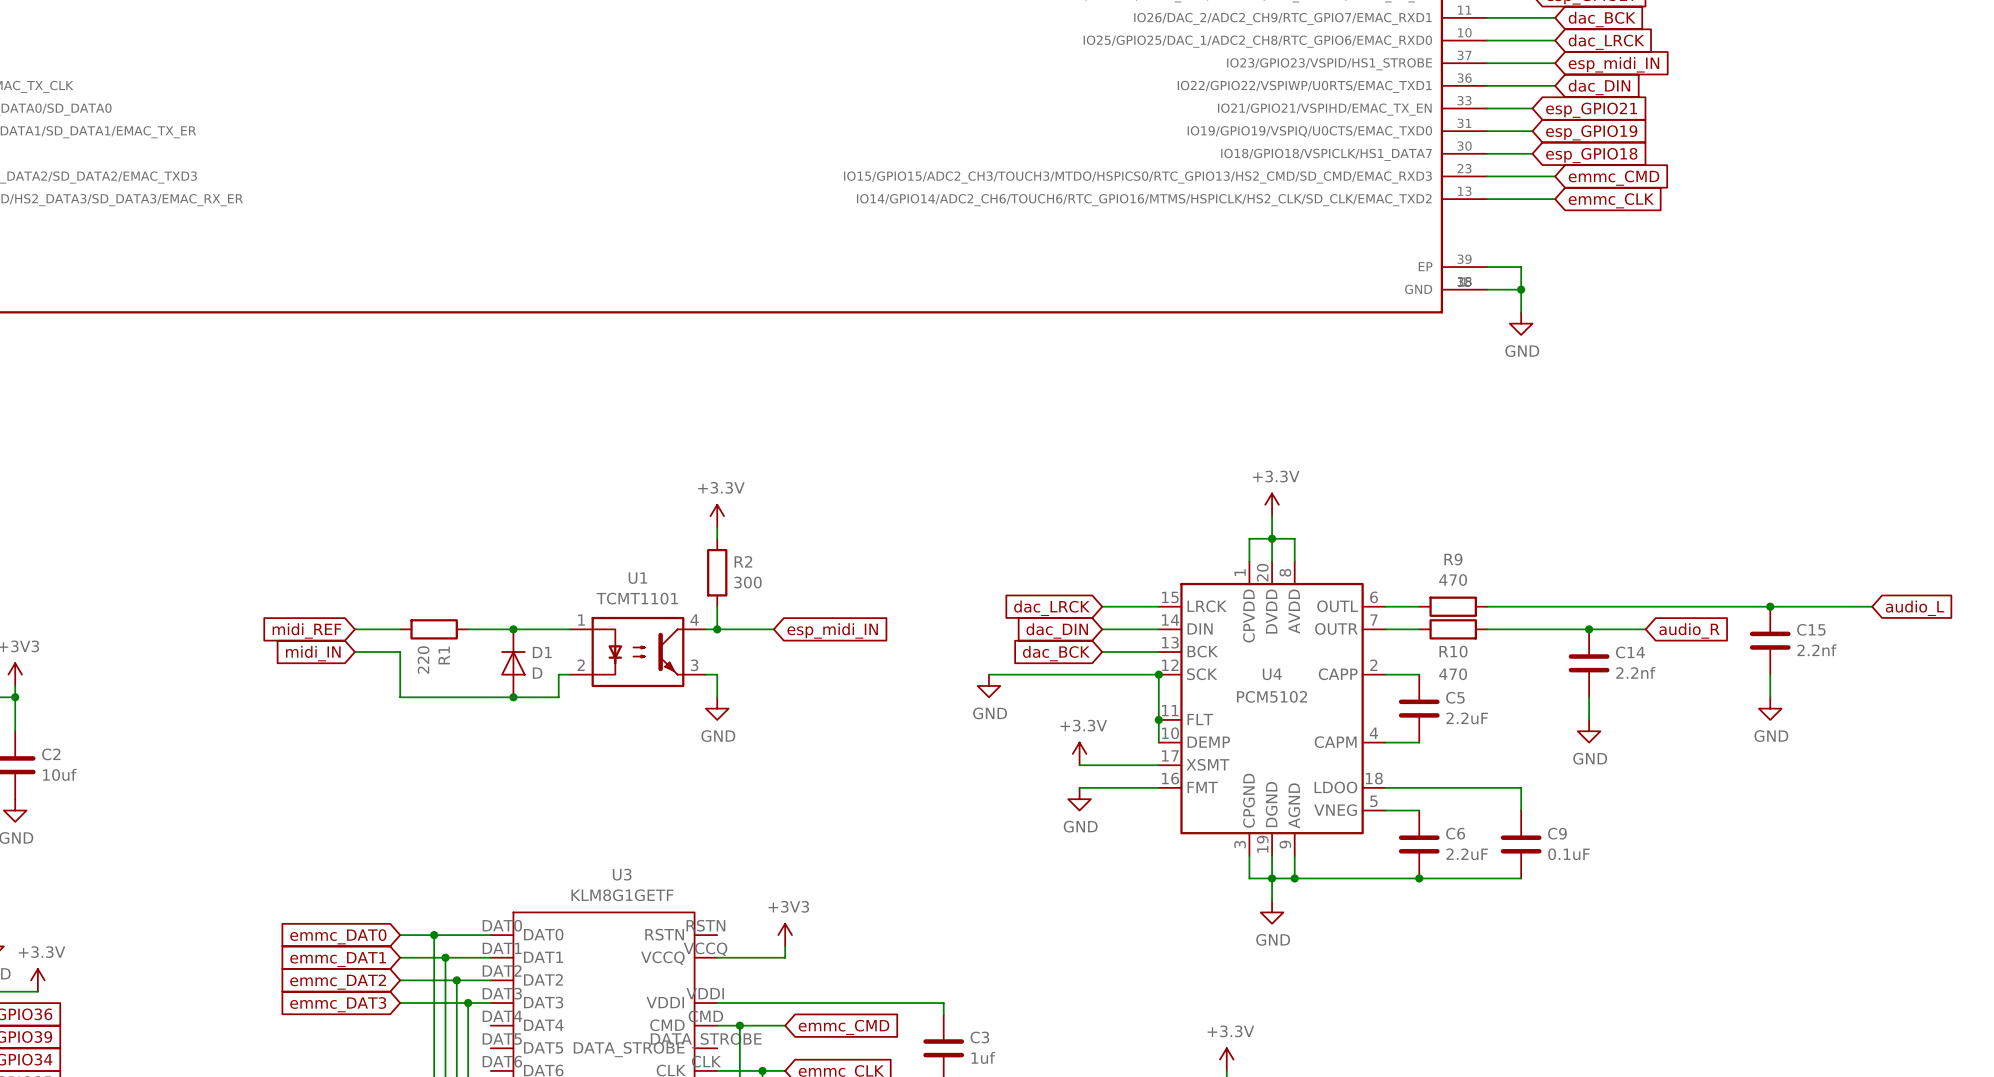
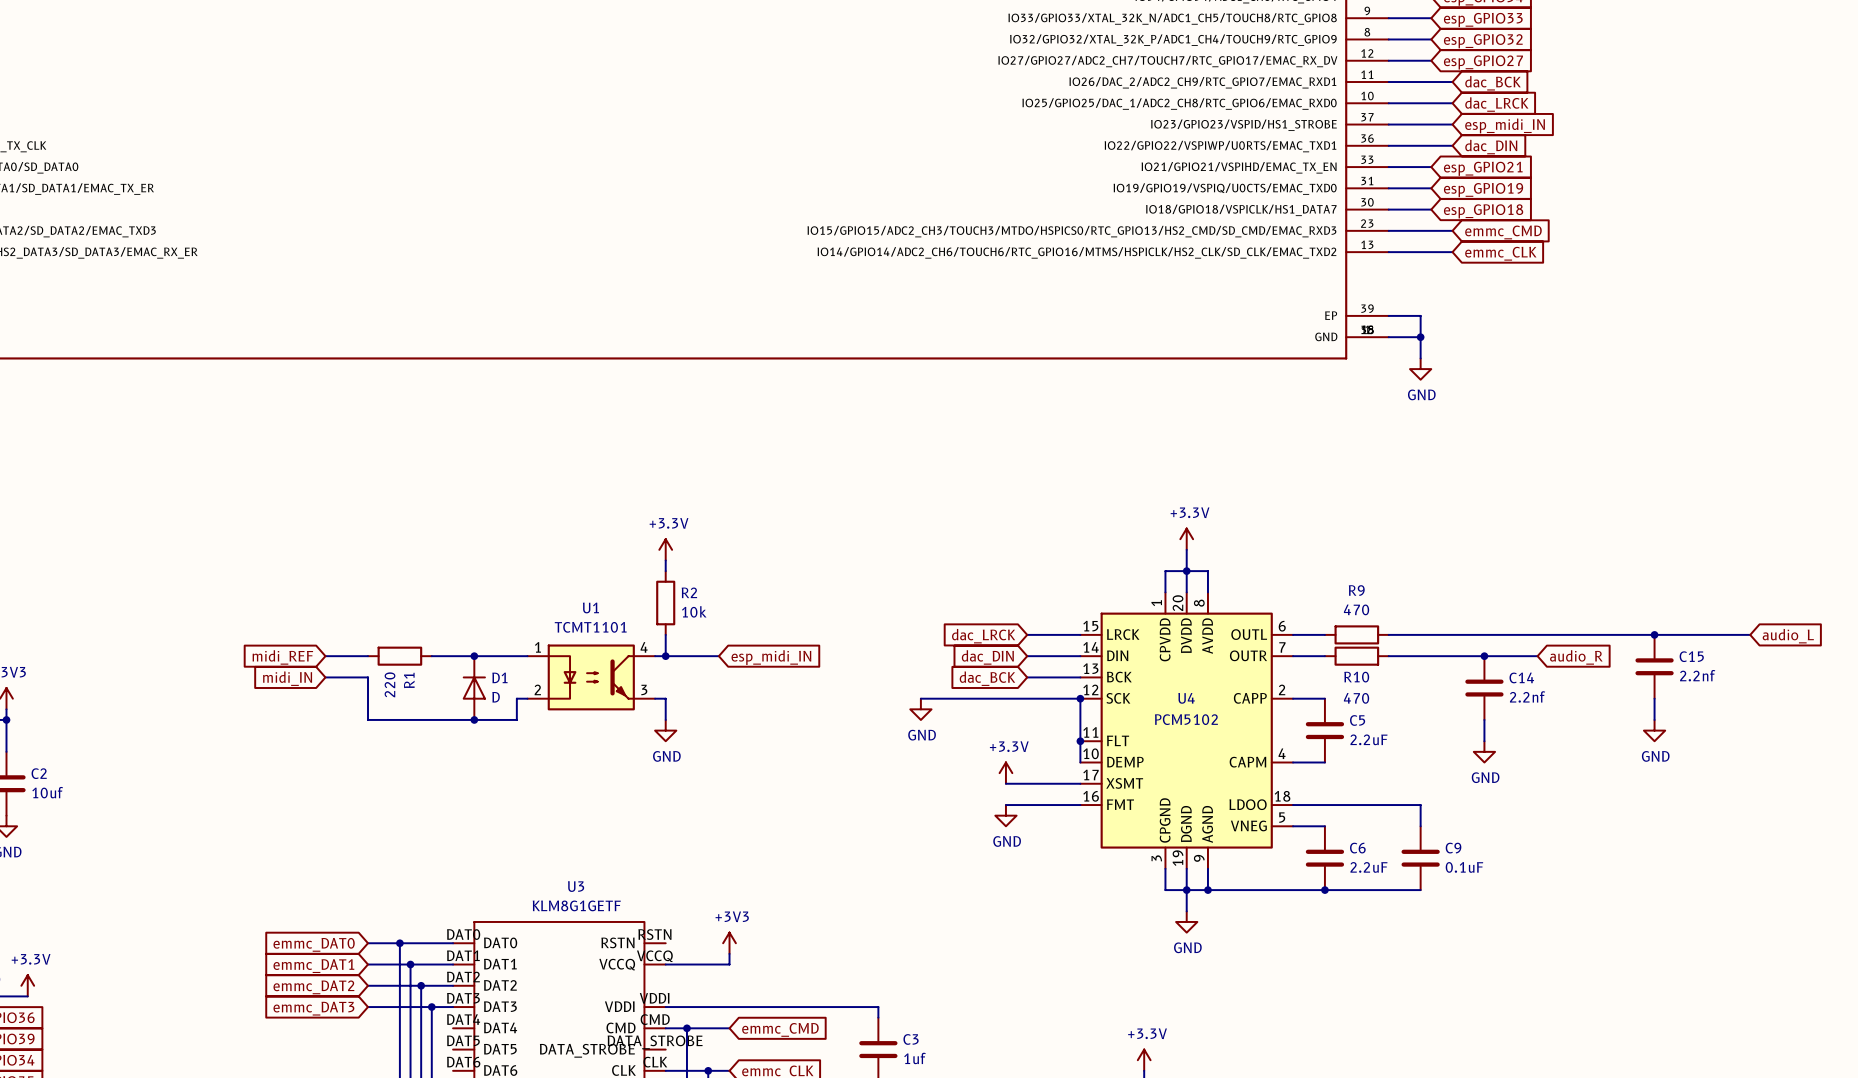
R2 value: 300 (747, 582) -> 10k (694, 611)

